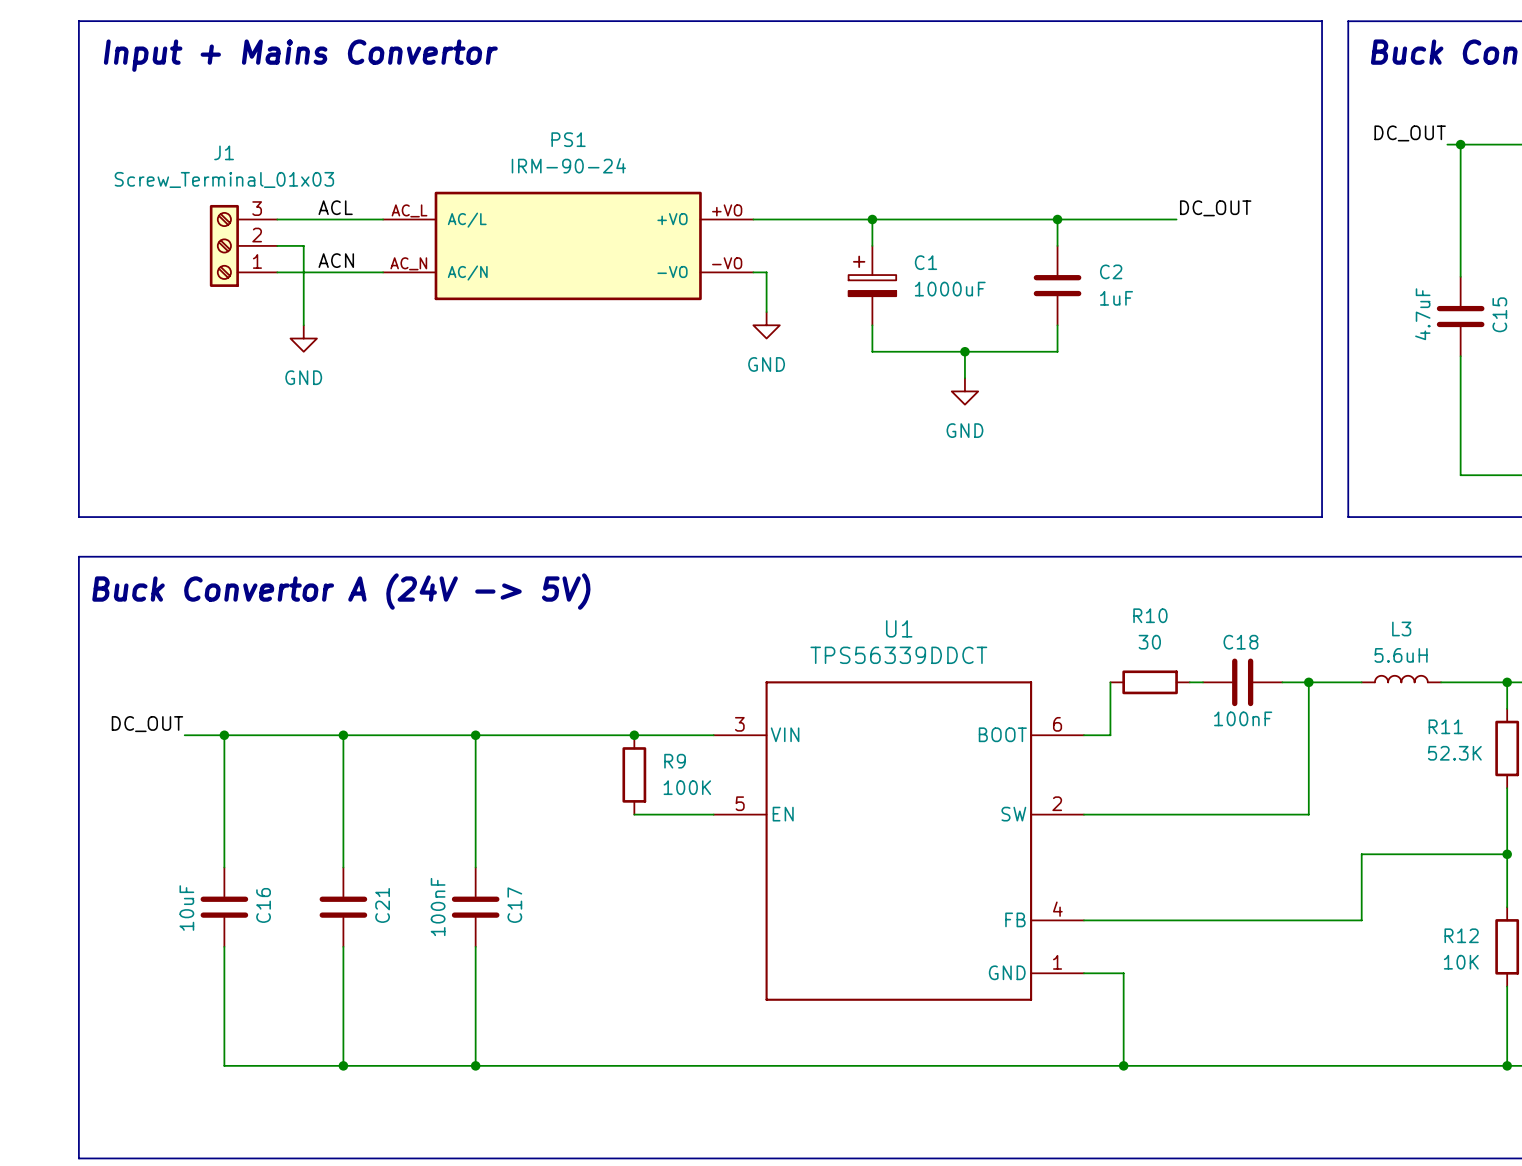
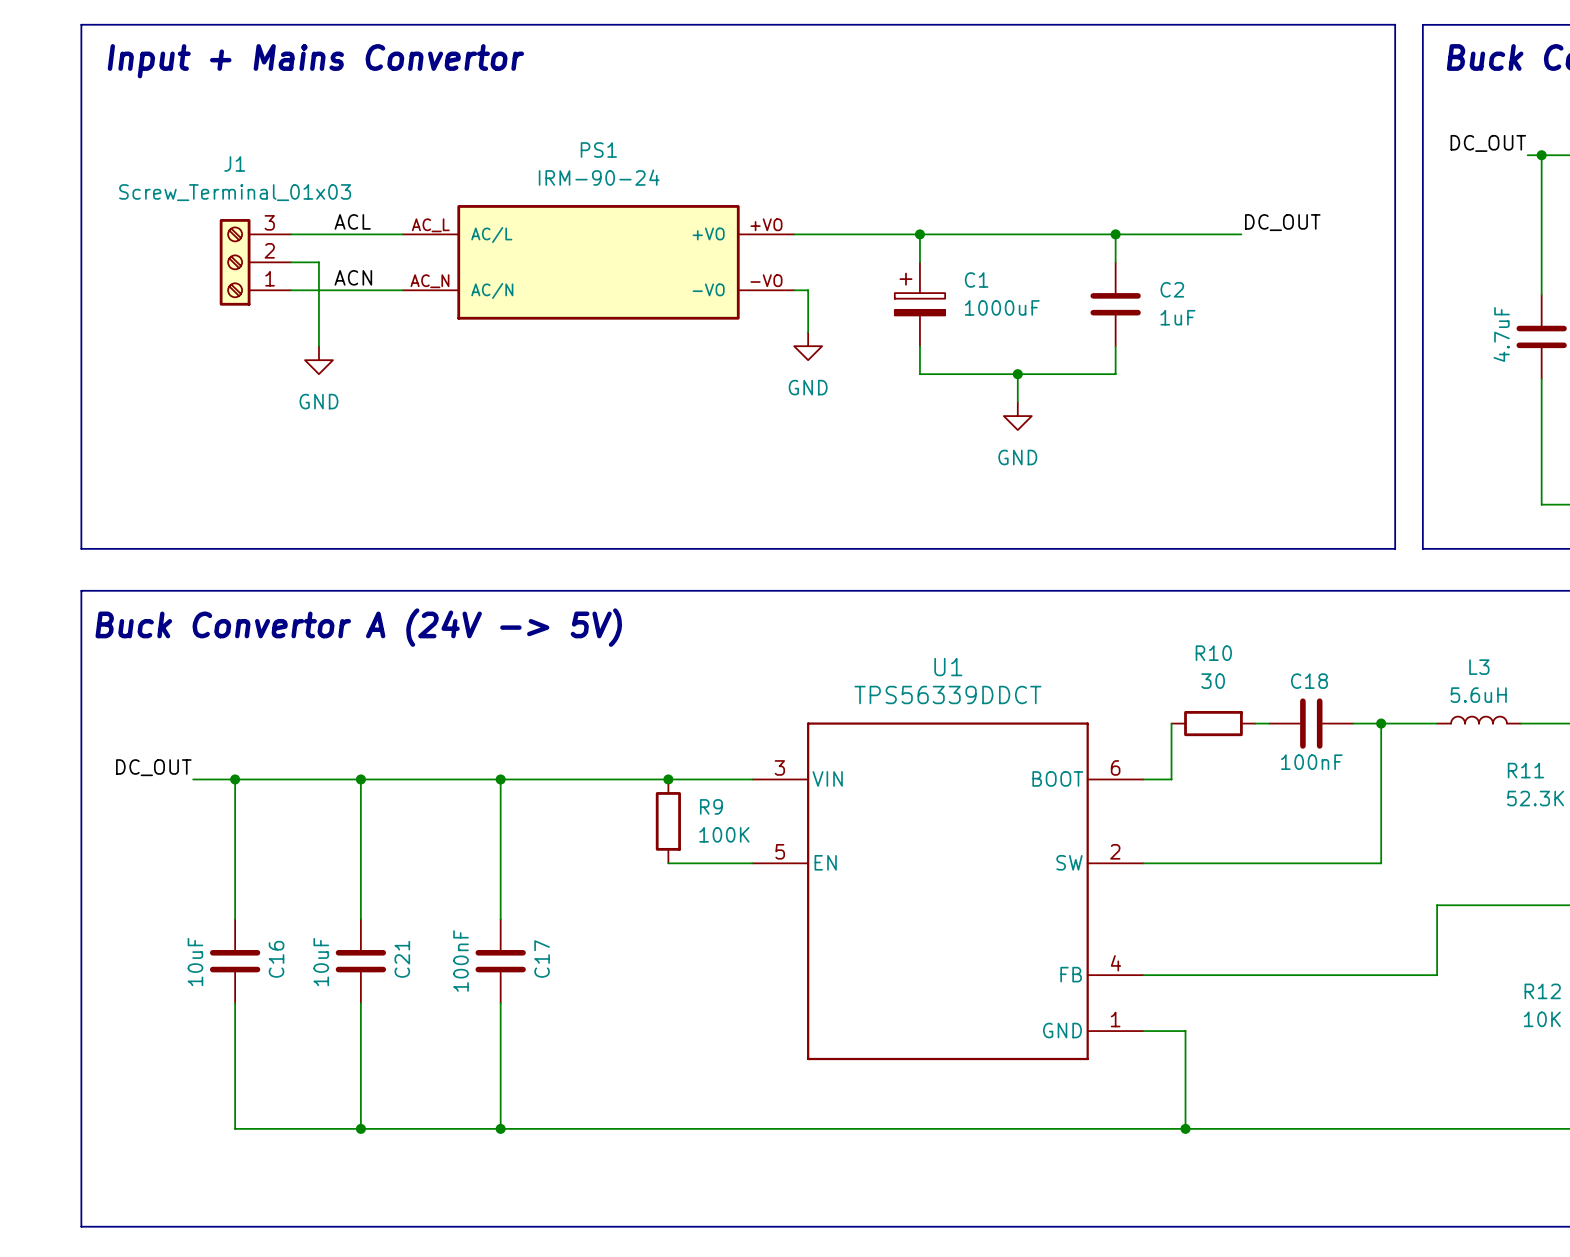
C21 value: none -> 10uF (321, 962)

